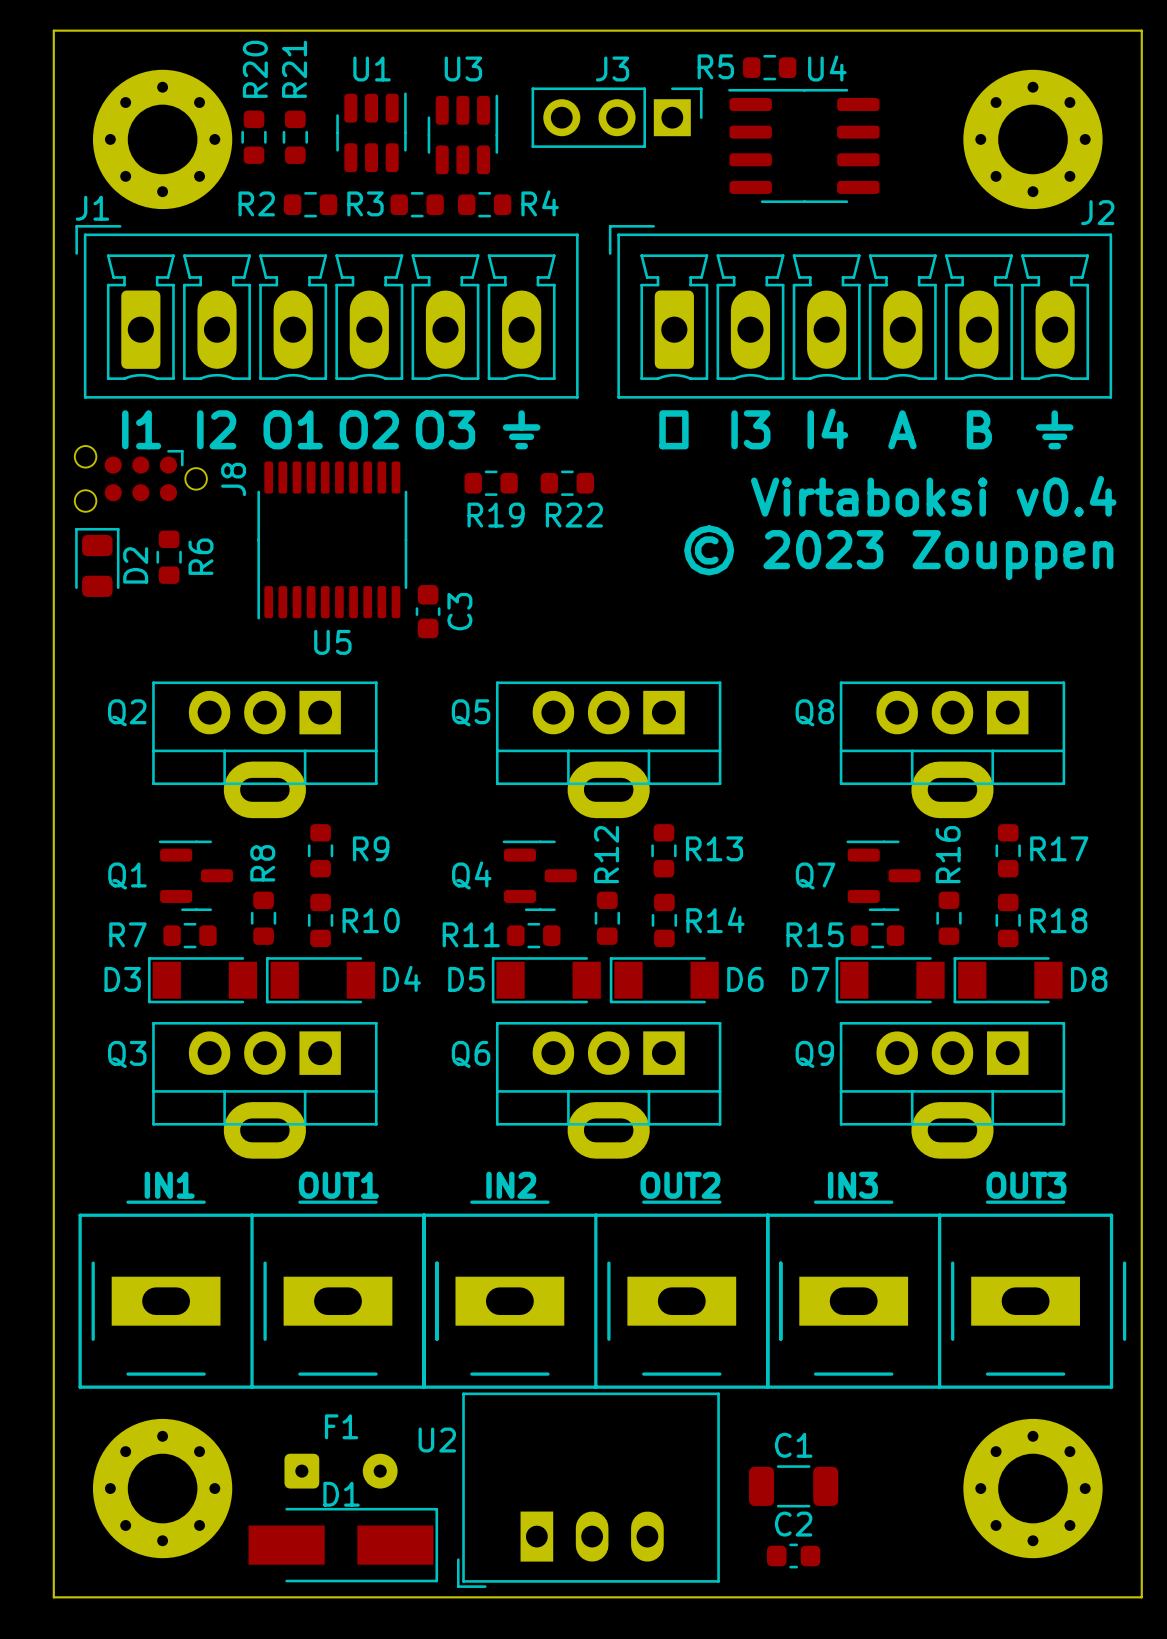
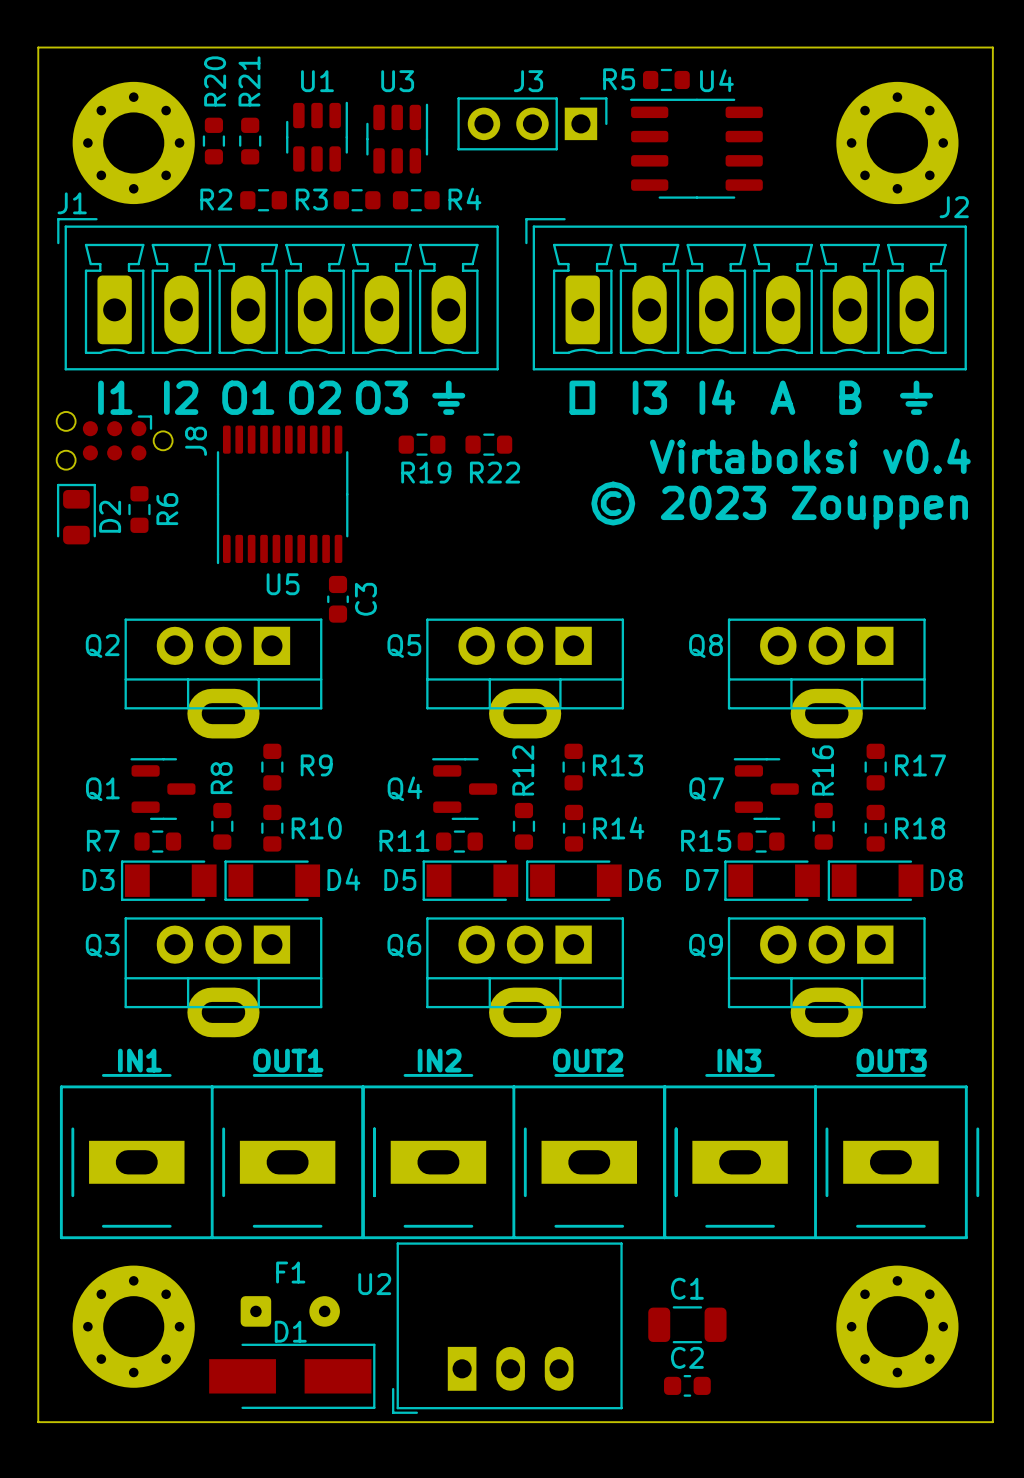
C3 position: (428, 611) -> (338, 599)

